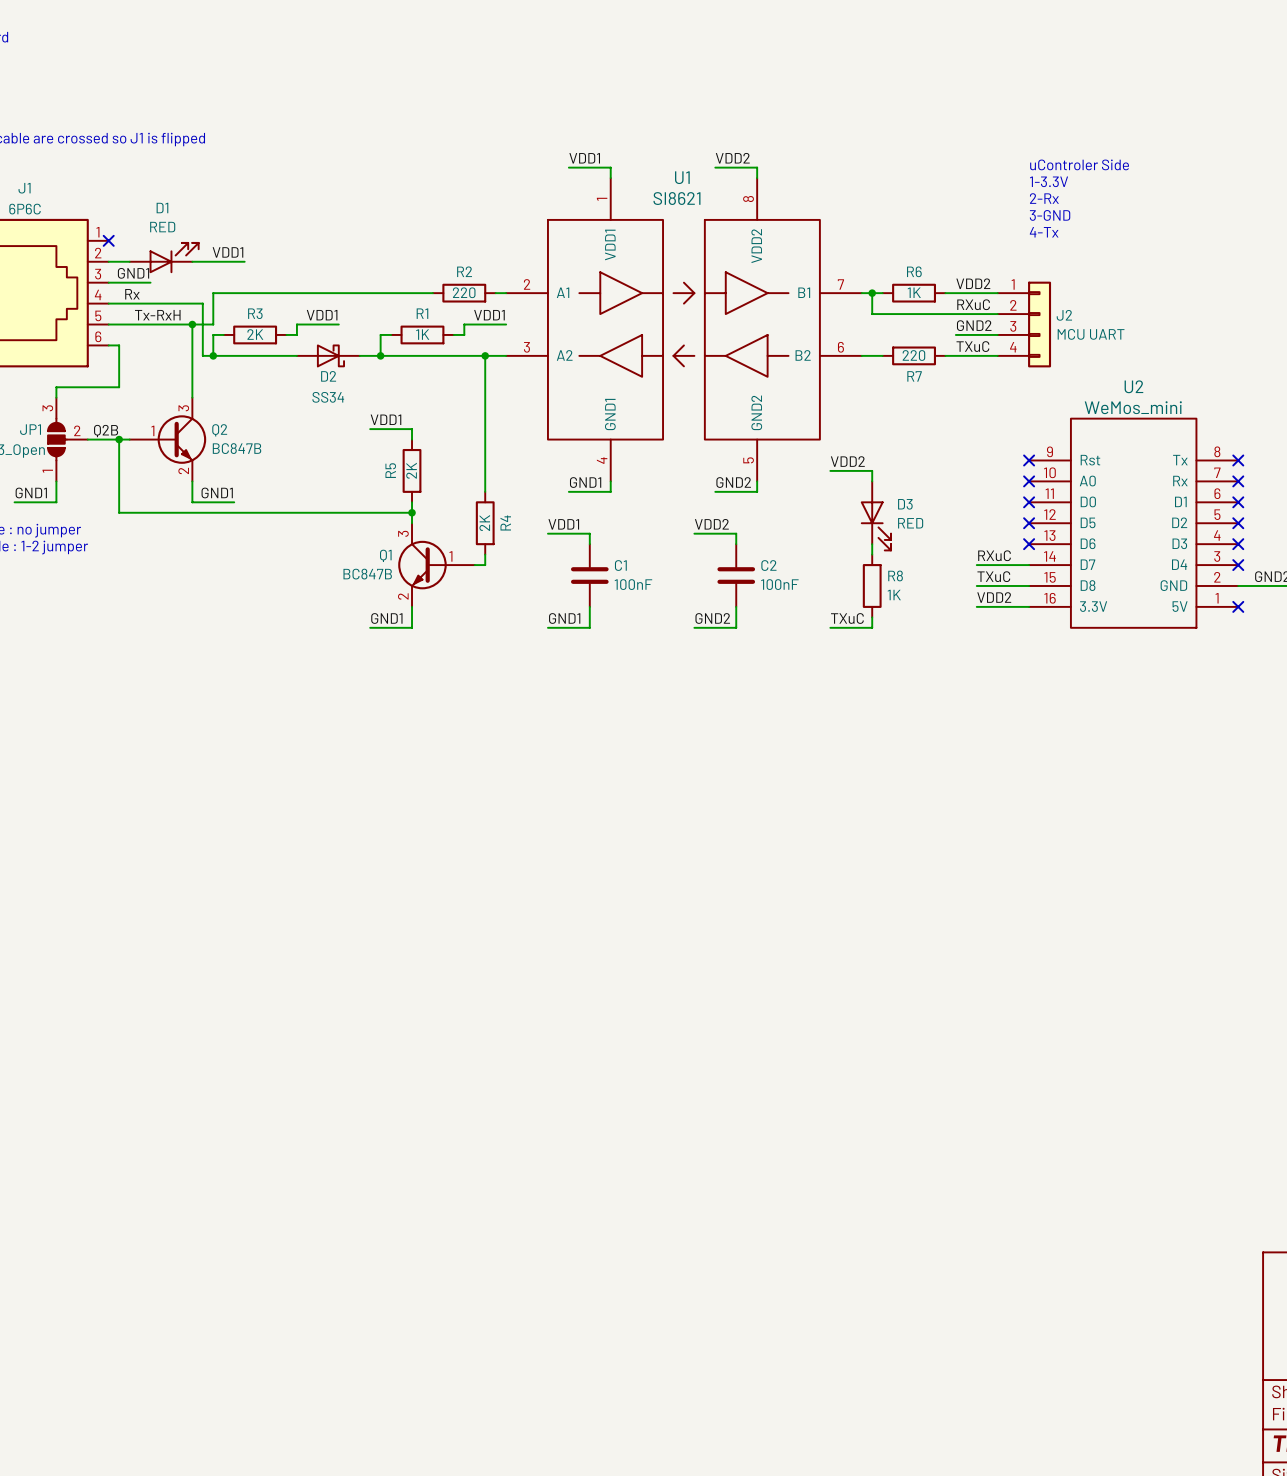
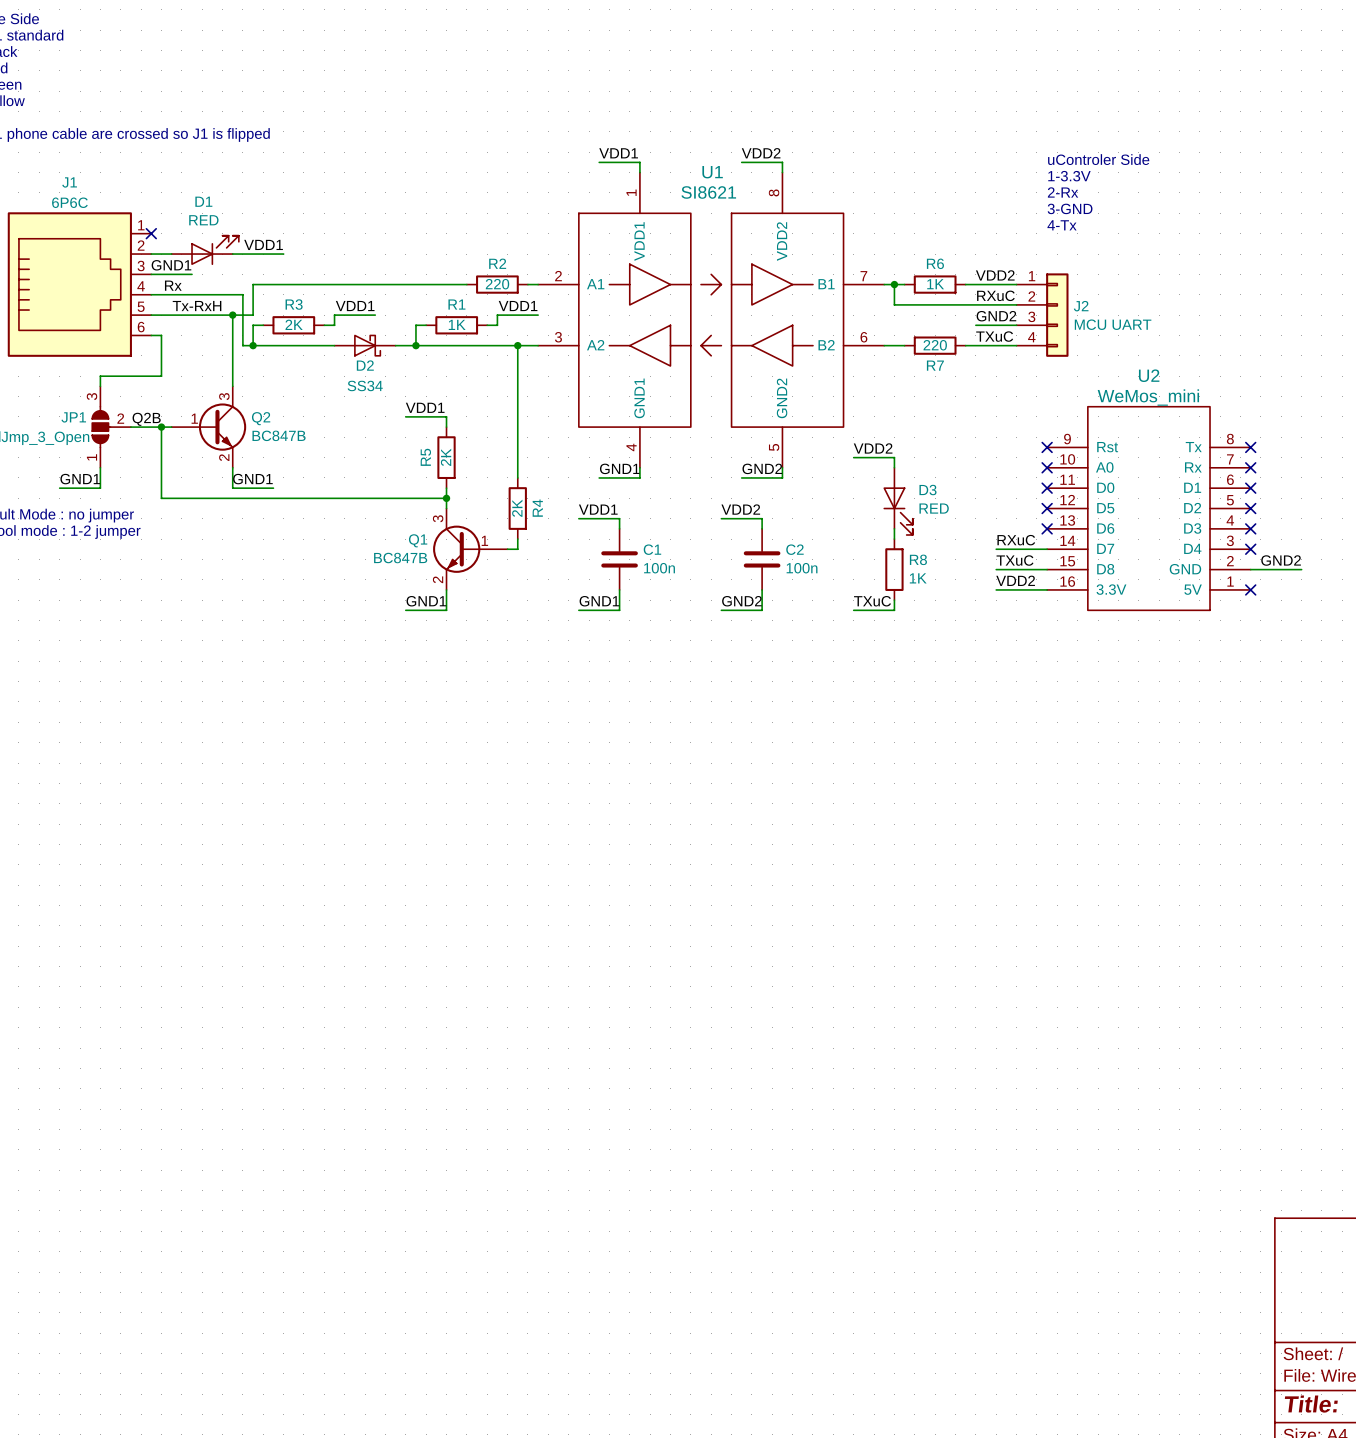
C1 value: 100nF (633, 584) -> 100n (659, 568)
C2 value: 100nF (779, 584) -> 100n (802, 568)

